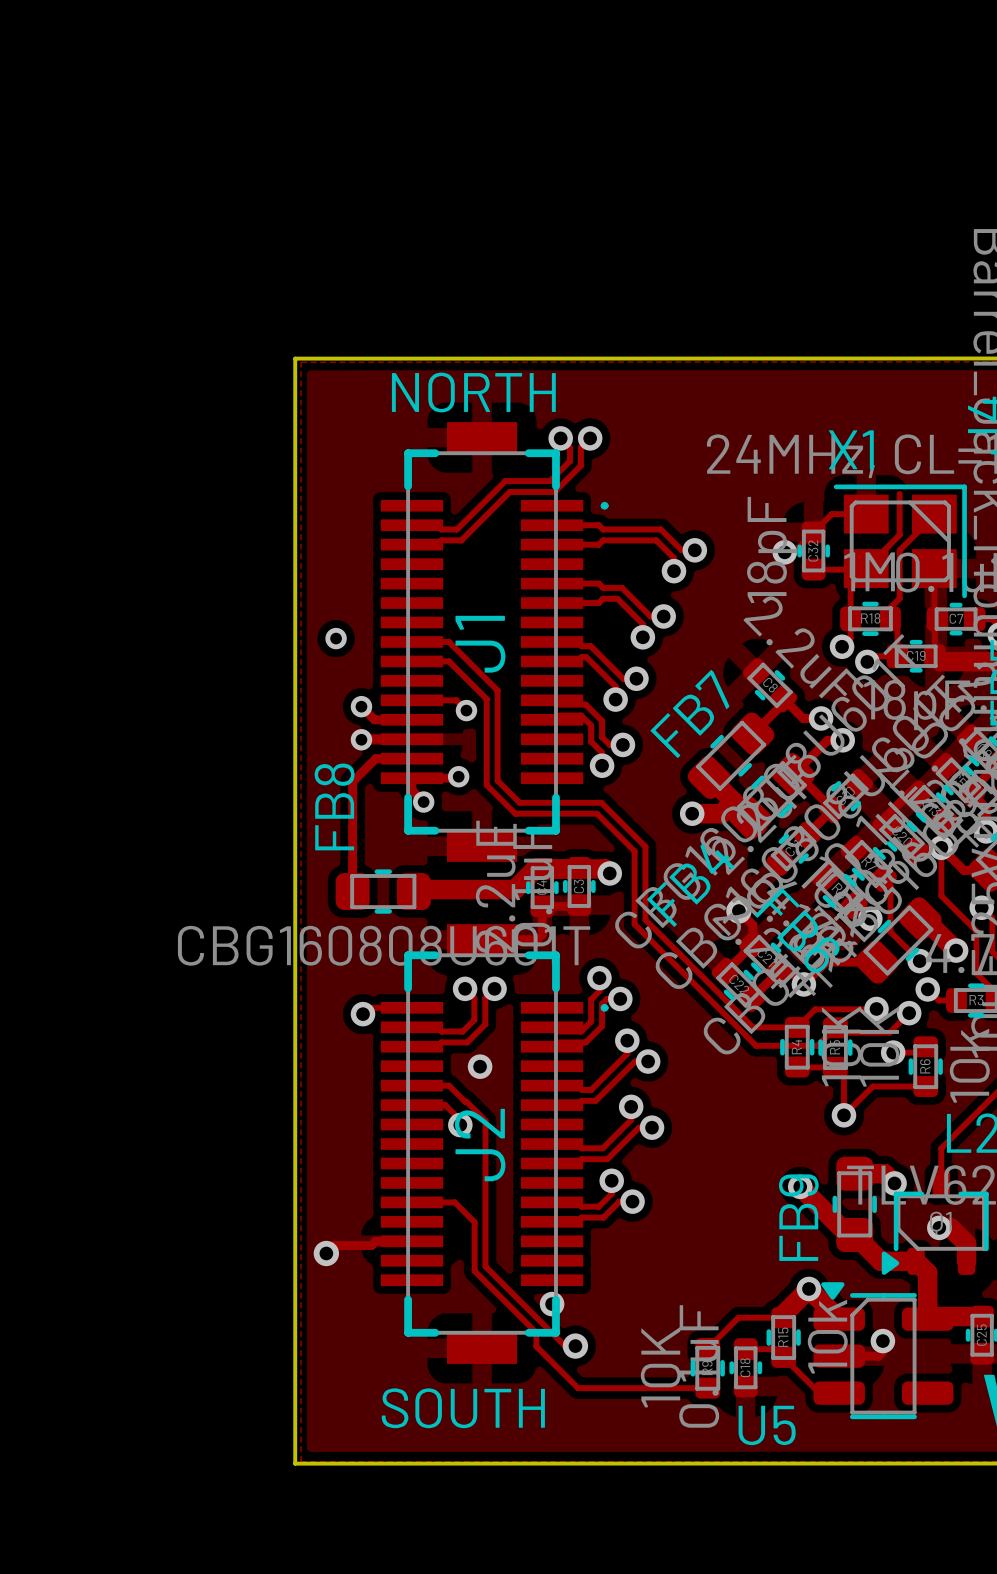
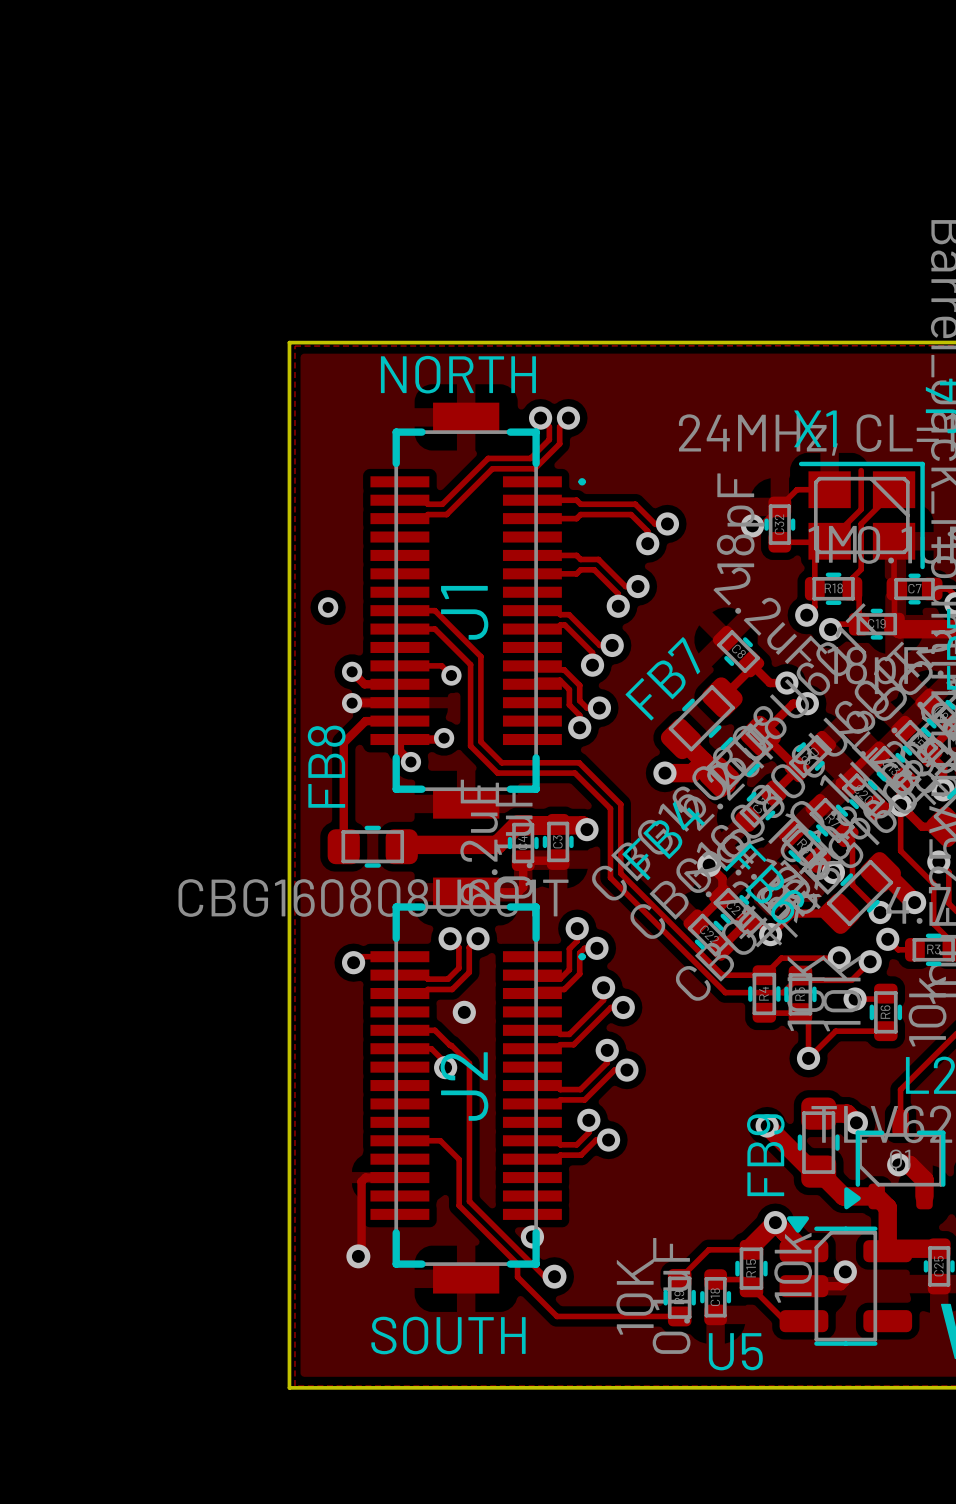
track: (371, 1245) (334, 1245) (326, 1253) -> (361, 1181) (361, 1253) (358, 1256)
via position: (326, 1253) -> (358, 1256)

